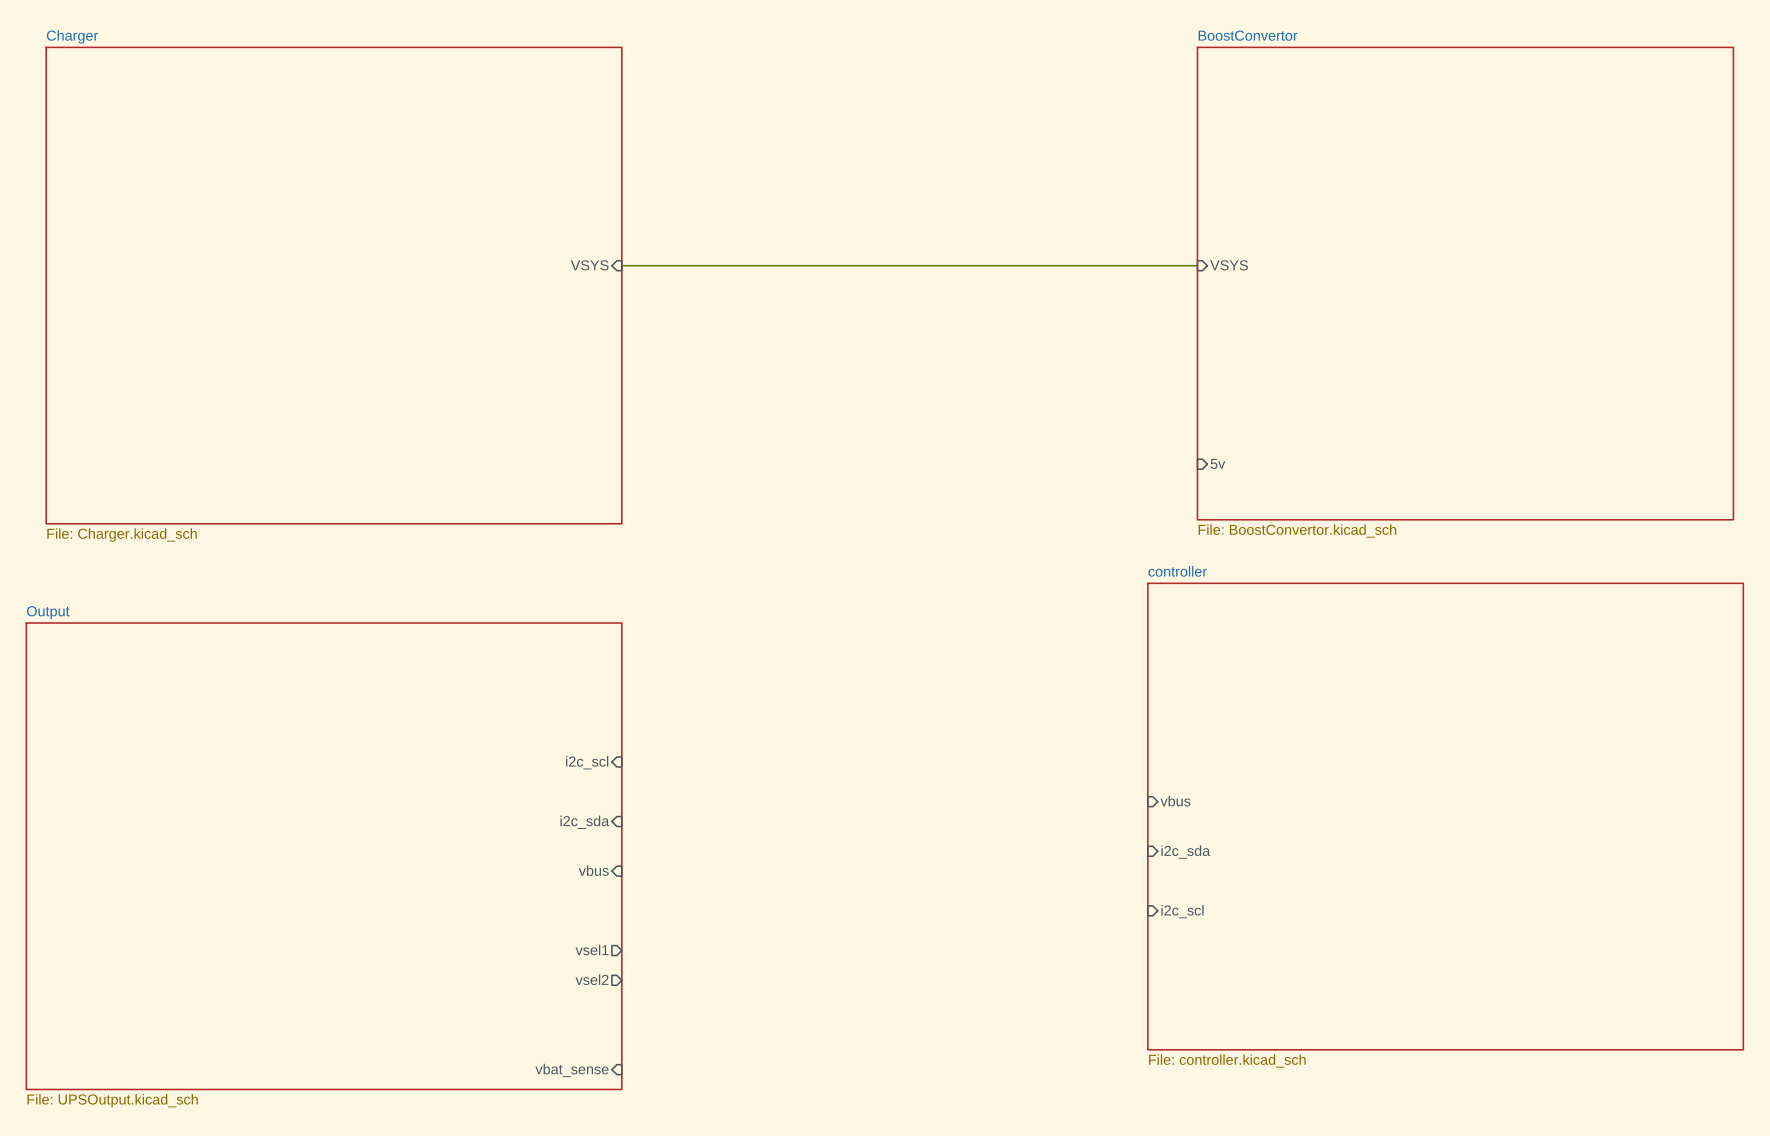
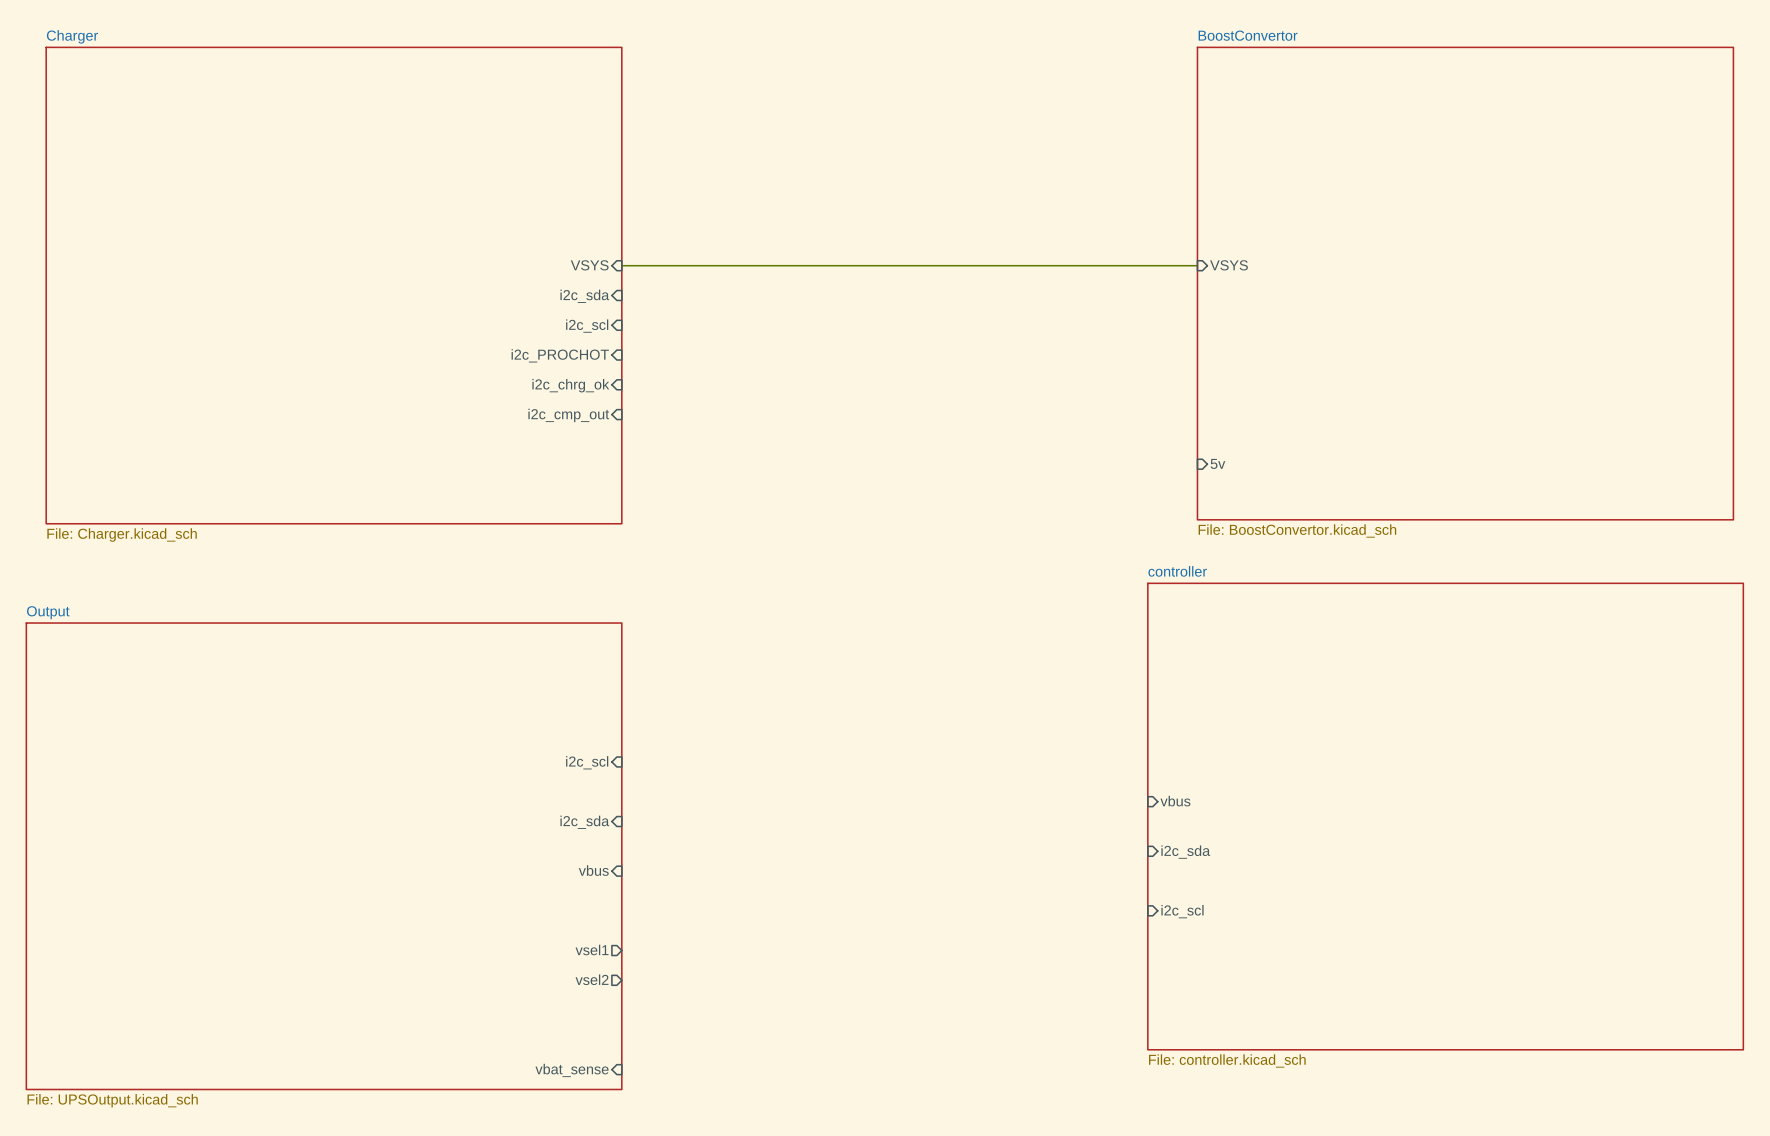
sheet pin: none -> i2c_sda (584, 296)
sheet pin: none -> i2c_scl (587, 326)
sheet pin: none -> i2c_PROCHOT (560, 355)
sheet pin: none -> i2c_chrg_ok (570, 385)
sheet pin: none -> i2c_cmp_out (568, 415)

